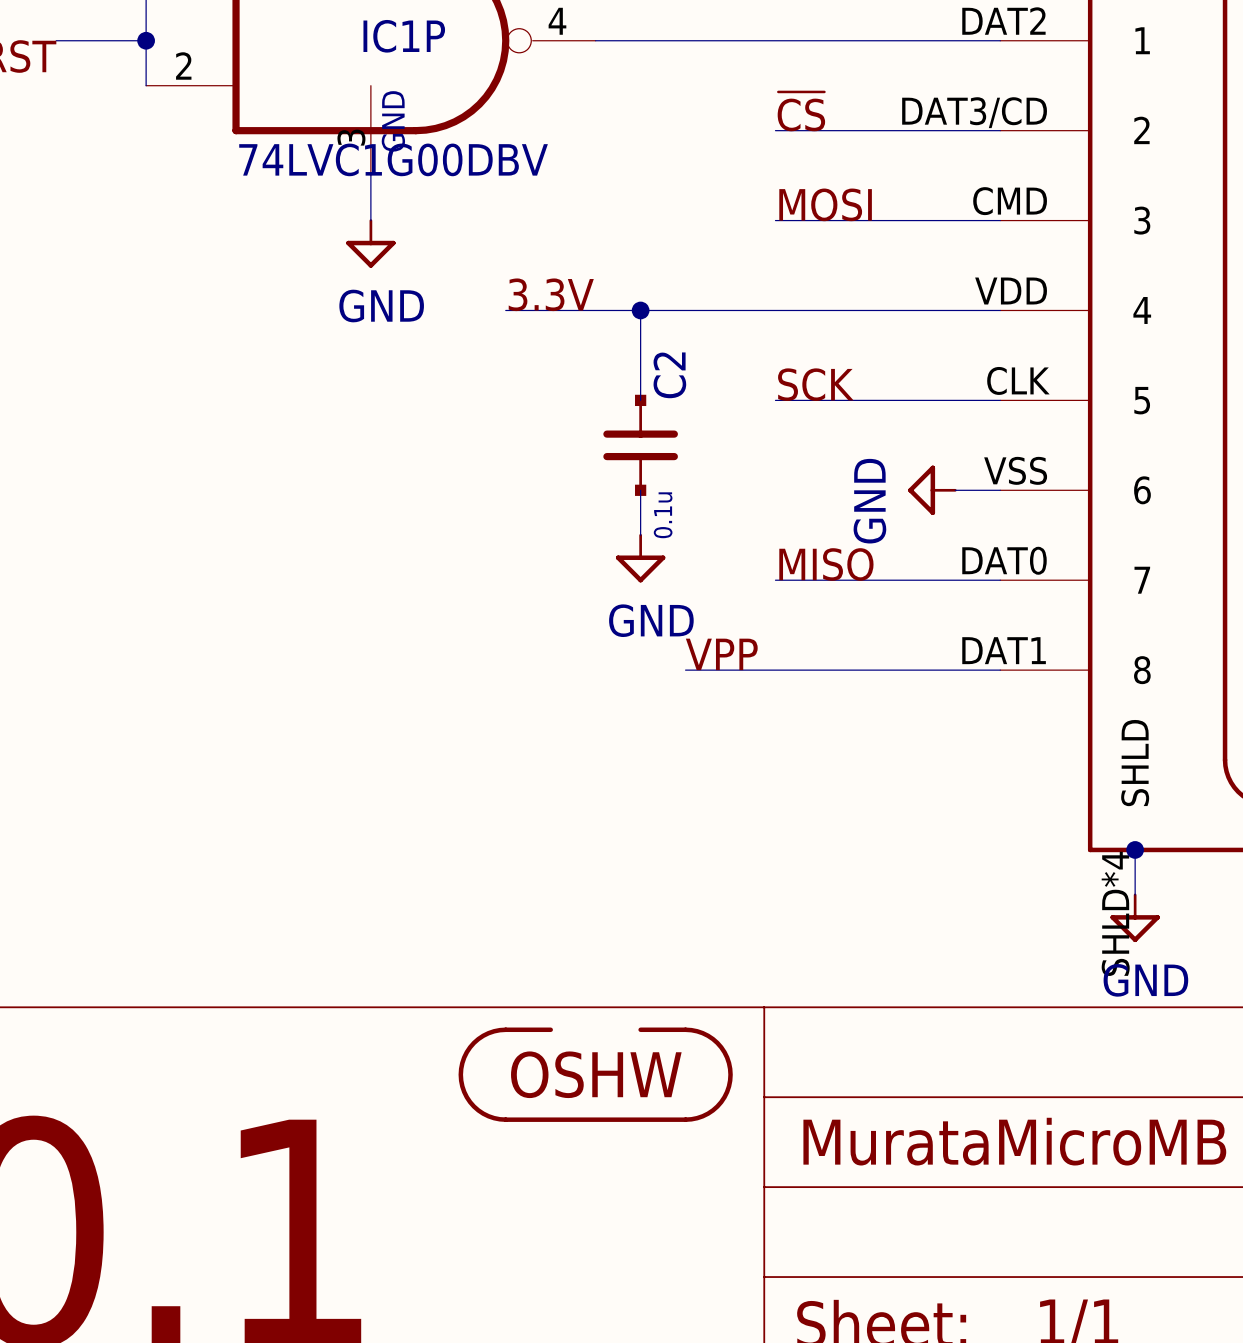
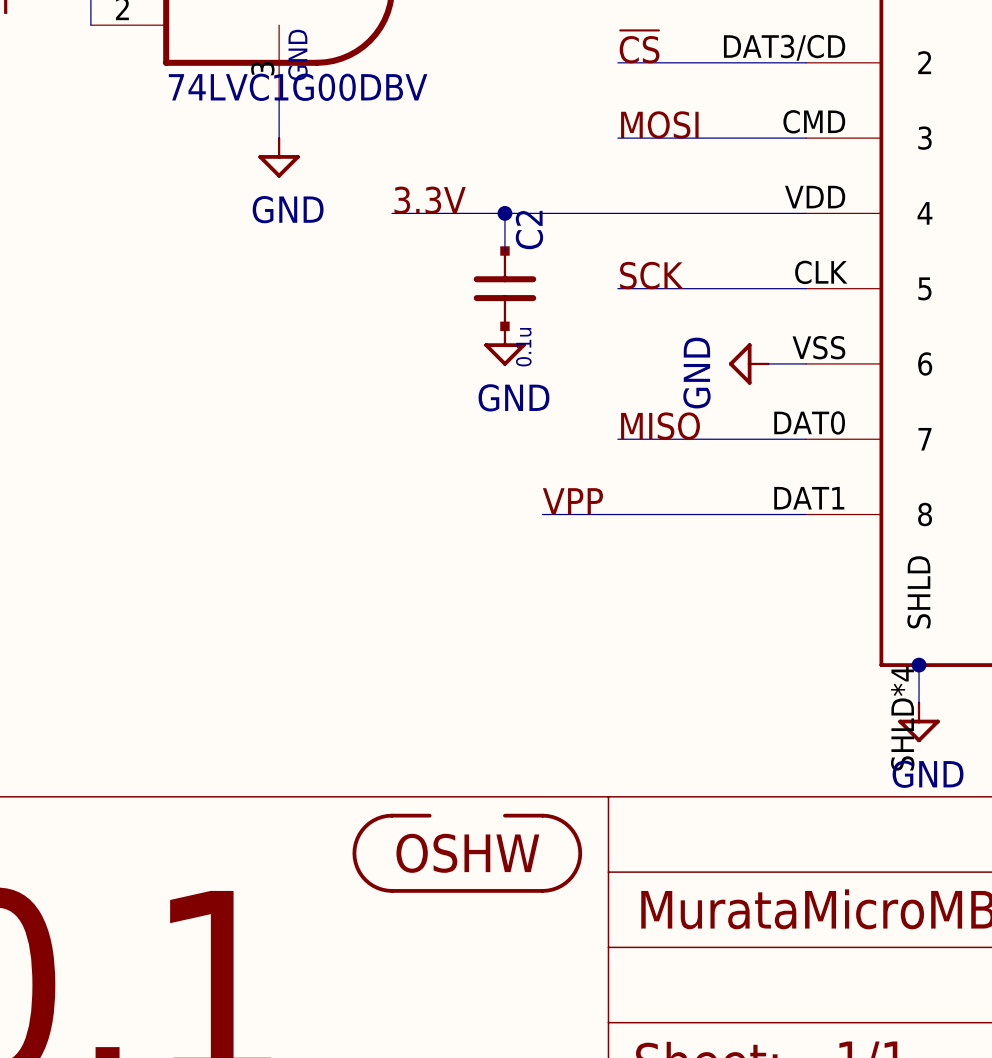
C2 position: (640, 445) -> (504, 288)
wire: (640, 490) (640, 535) -> none
power symbol position: GND (640, 558) -> GND (504, 345)

